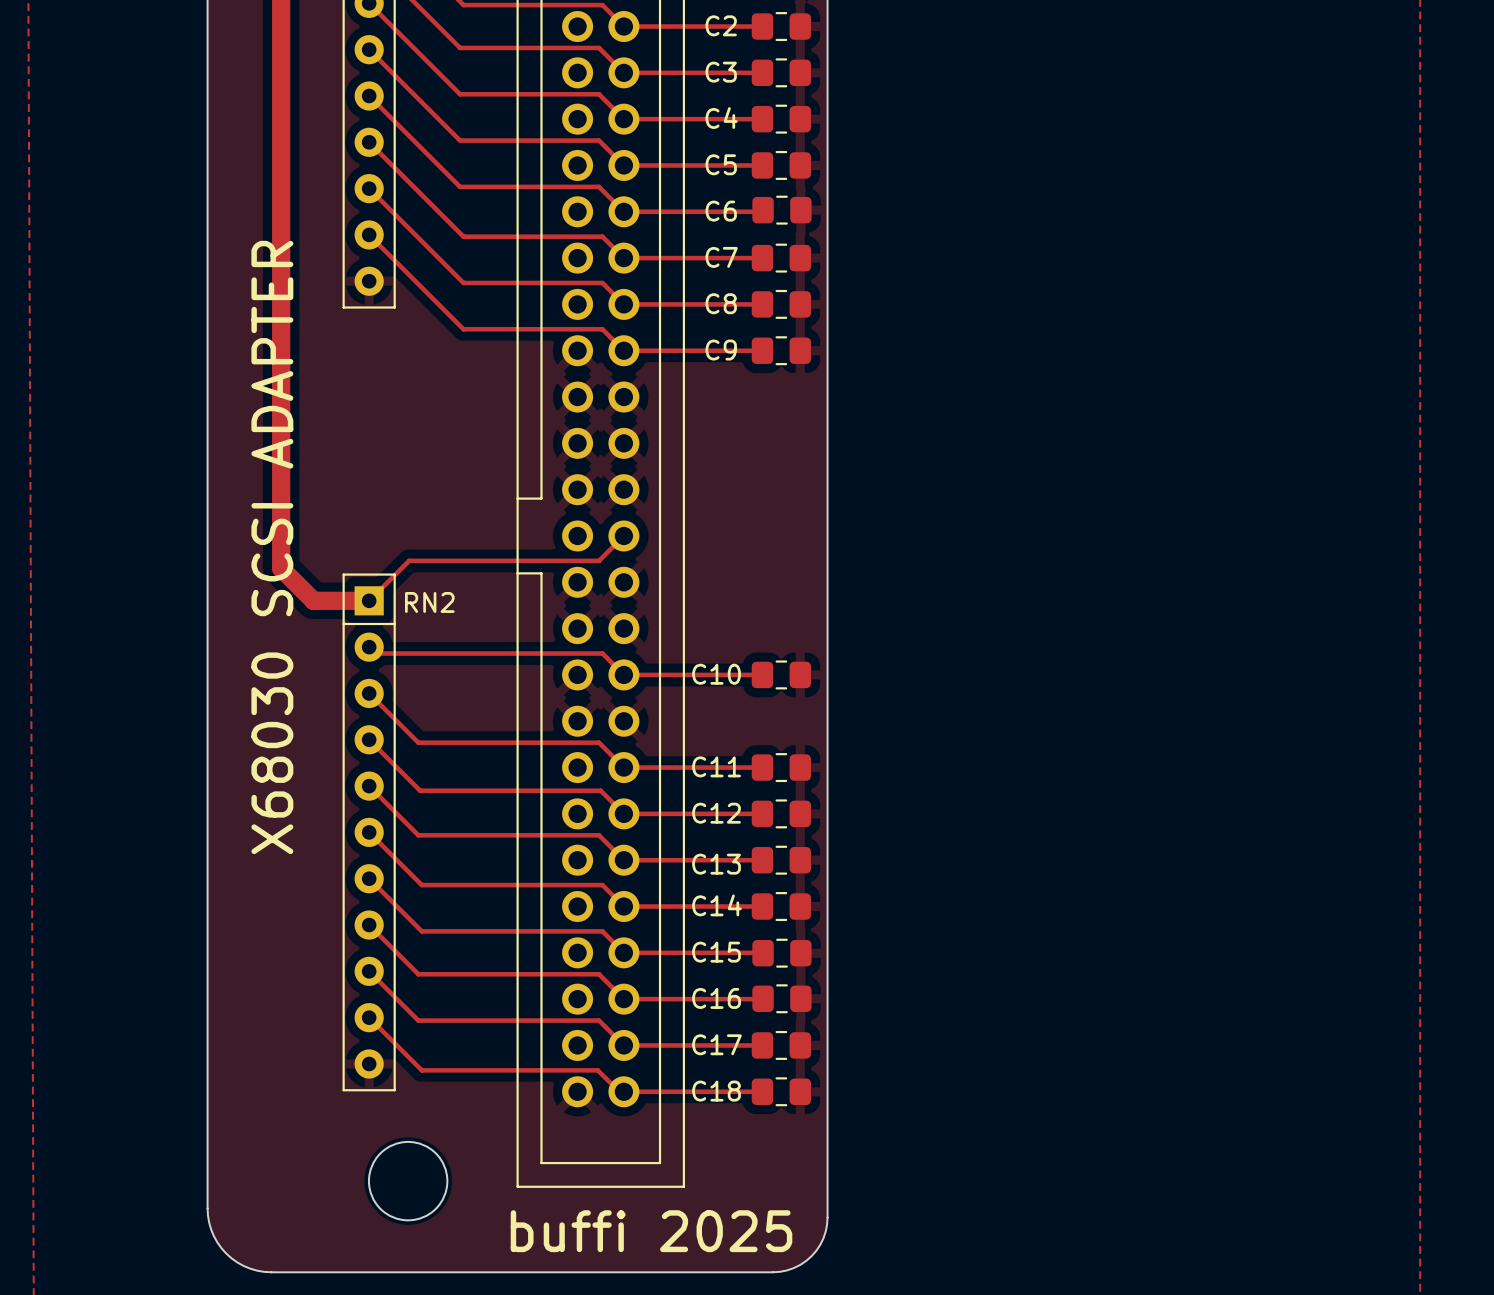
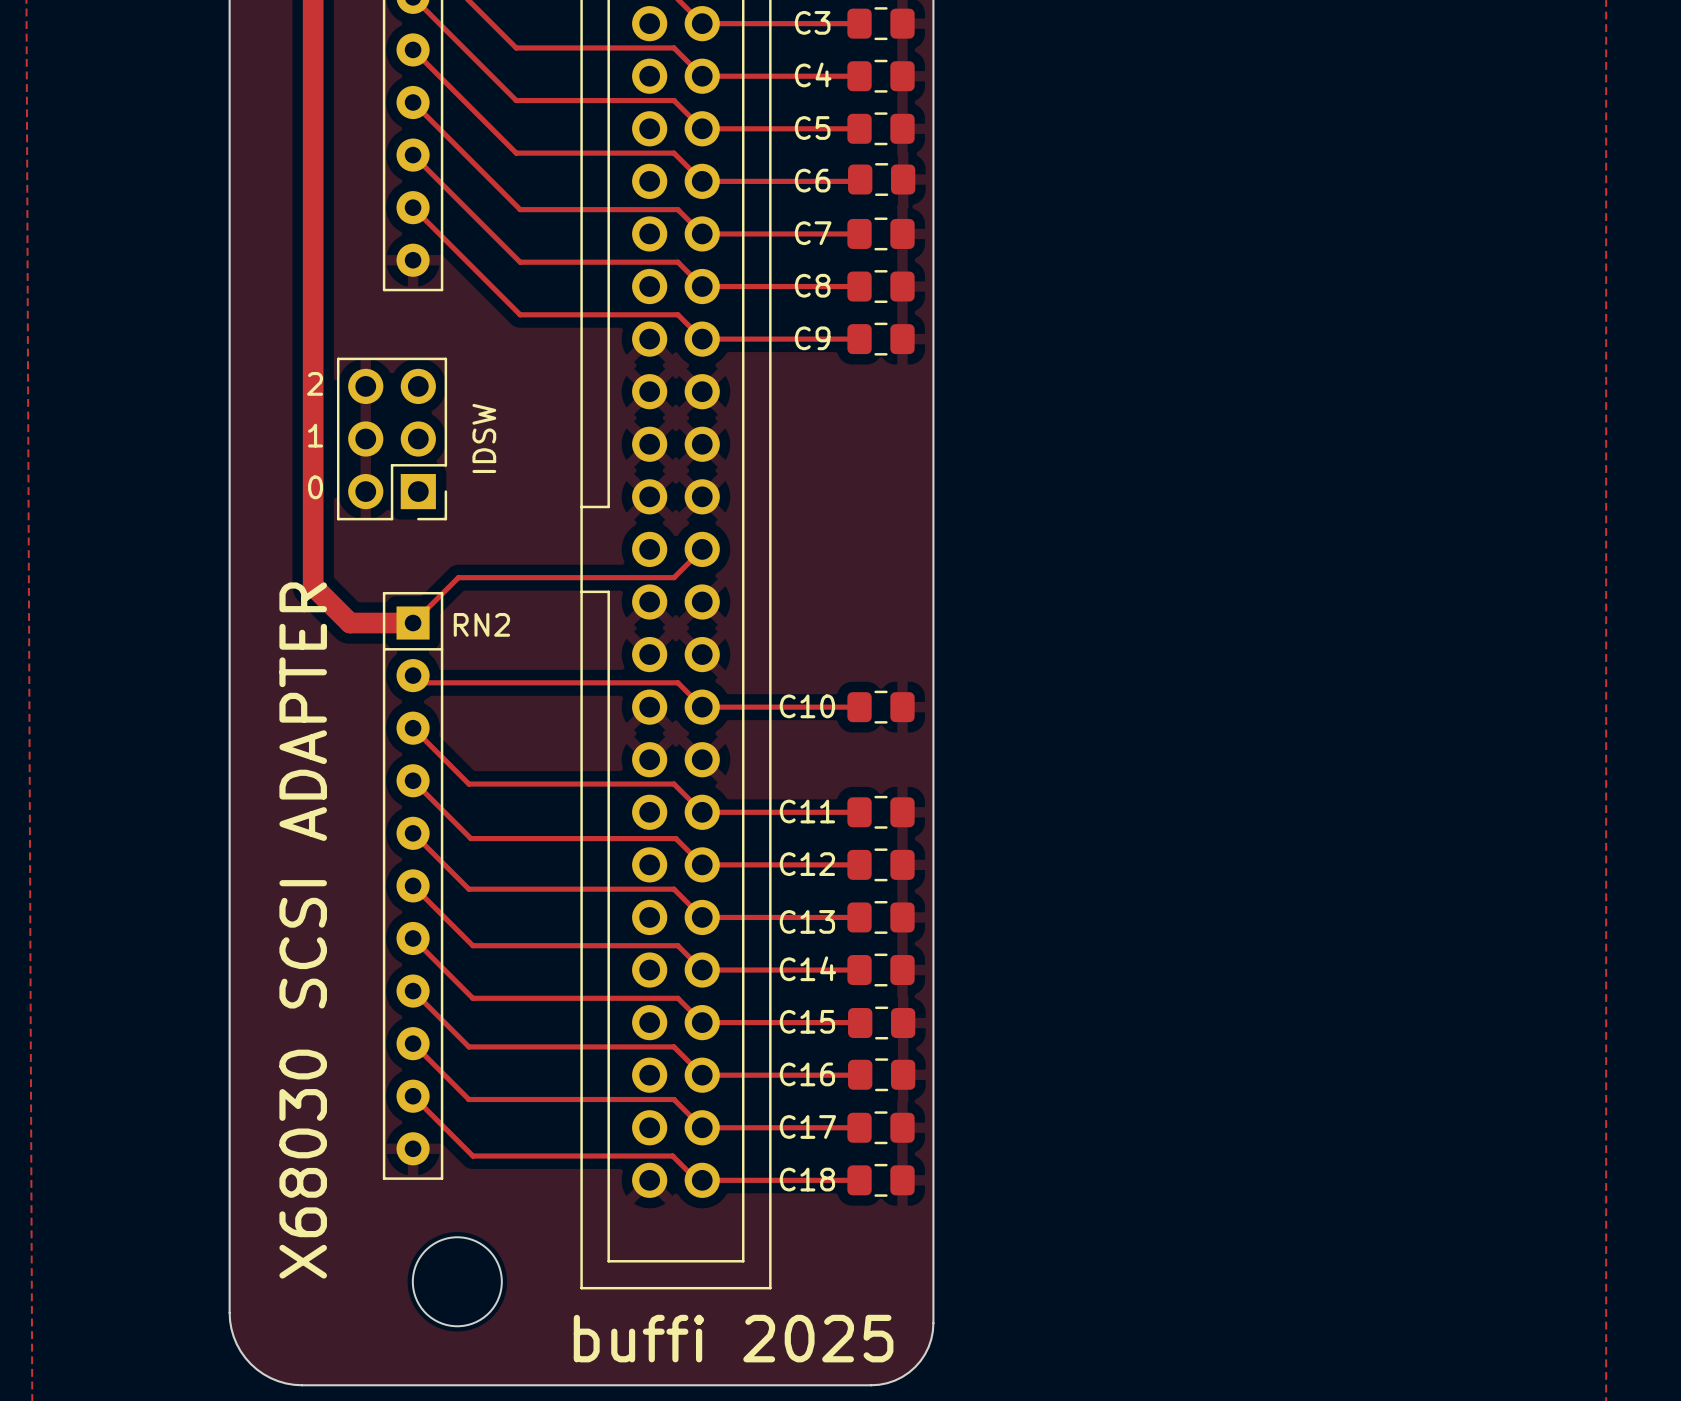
text: none -> 2 (315, 383)
text: none -> 1 (315, 435)
part: none -> (392, 439)
text: none -> IDSW (484, 438)
text: none -> 0 (315, 487)
text position: X68030 SCSI ADAPTER (272, 547) -> X68030 SCSI ADAPTER (303, 930)

